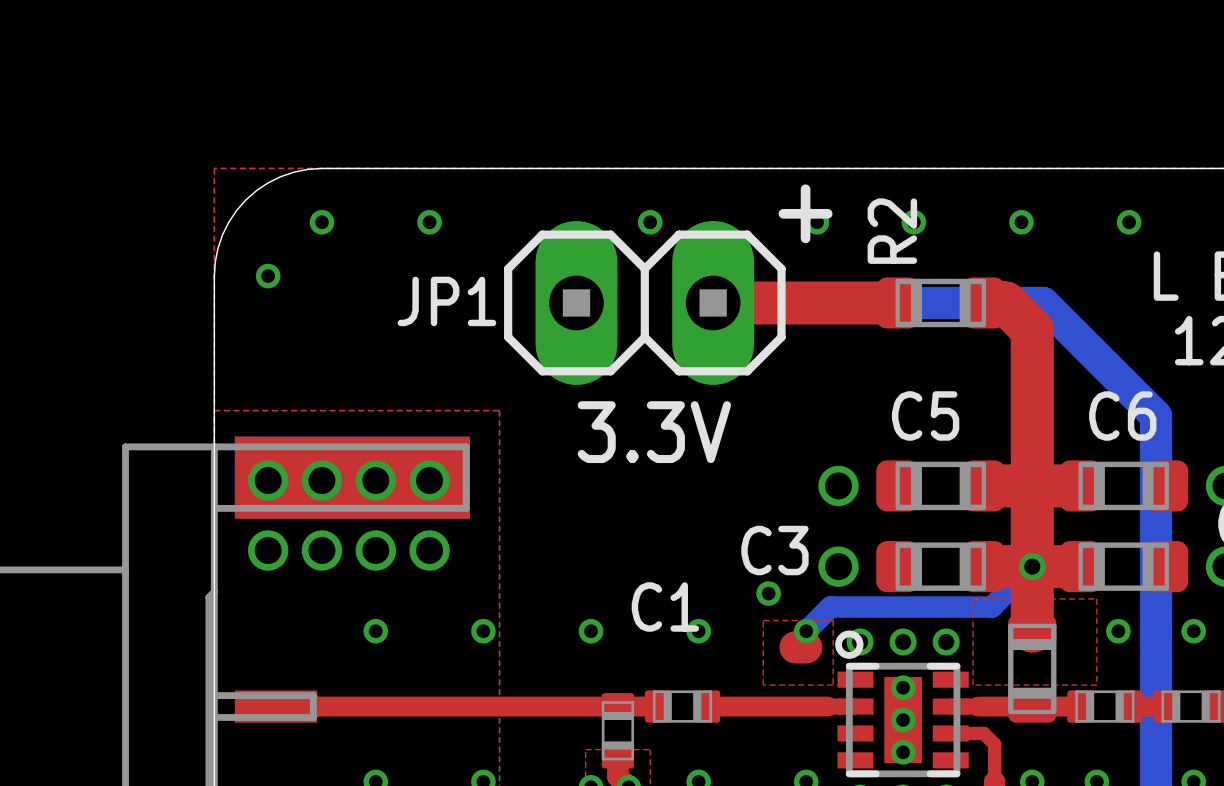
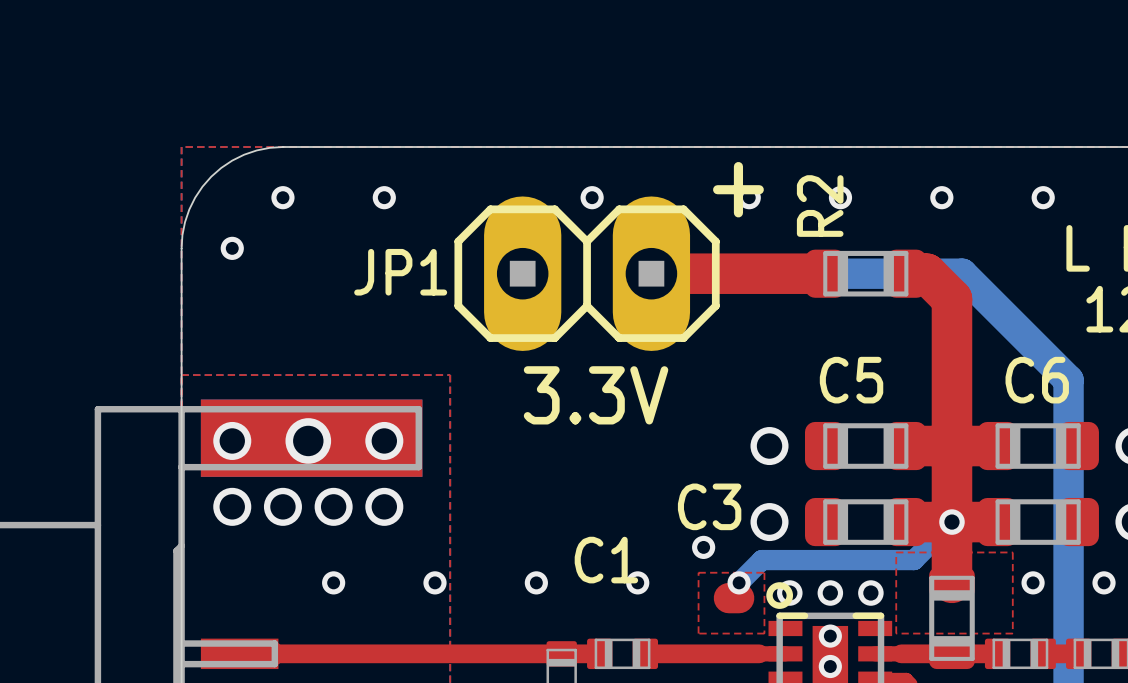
via: (321, 480) -> none
via: none -> (308, 440)
via: (375, 480) -> none

